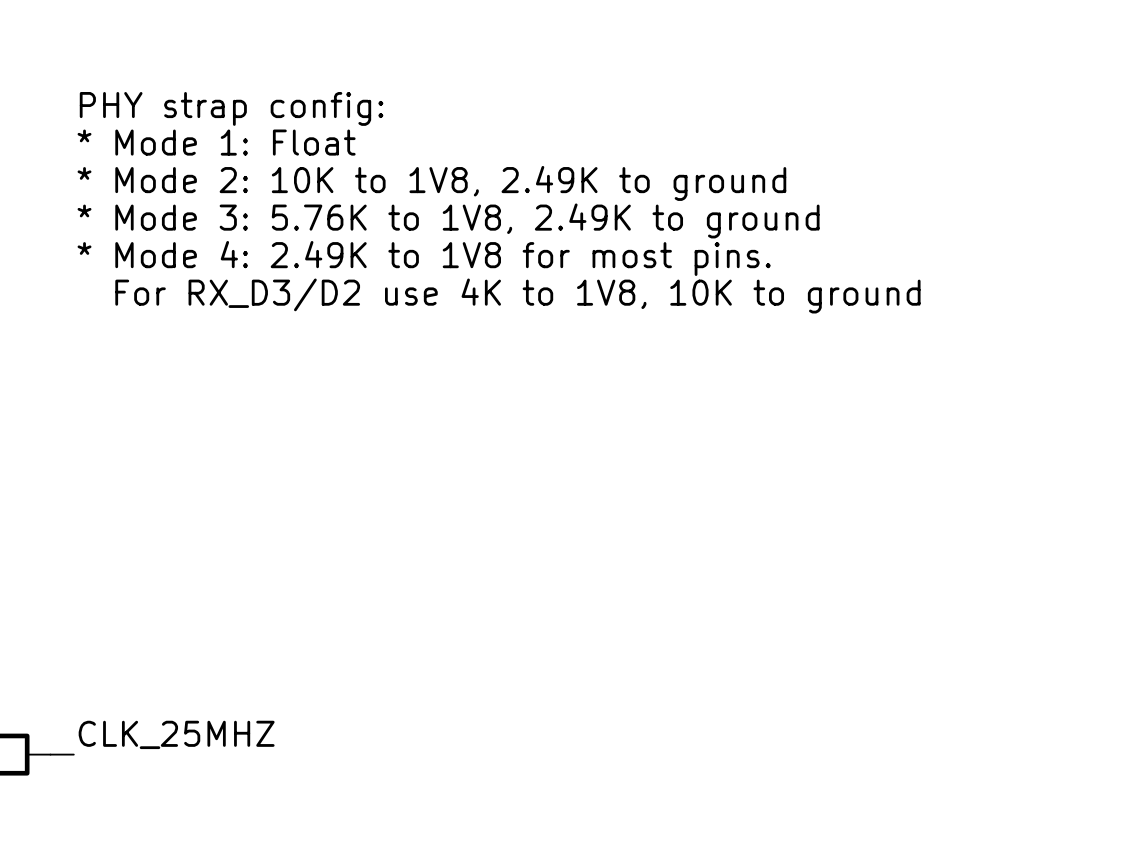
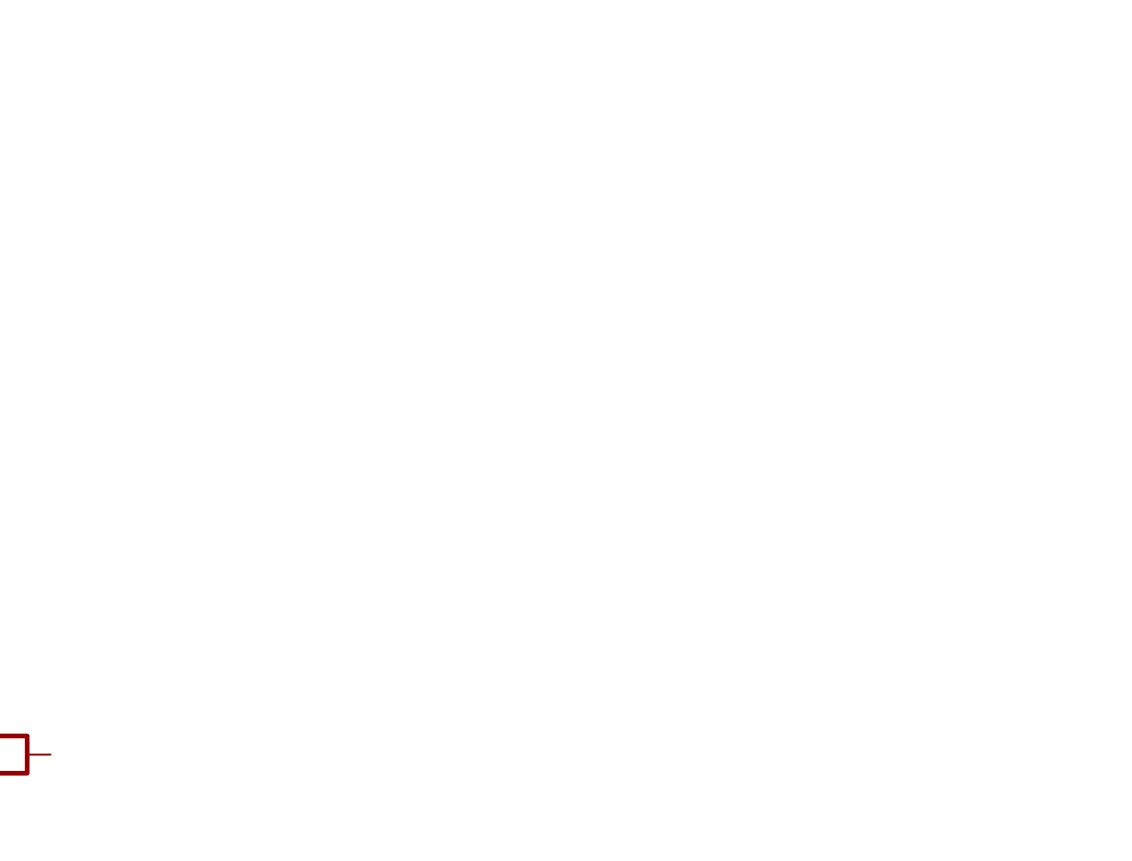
text: PHY strap config: (231, 108) -> none
text: * Mode 1: Float (216, 142) -> none
text: * Mode 2: 10K to 1V8, 2.49K to ground (431, 183) -> none
text: * Mode 3: 5.76K to 1V8, 2.49K to ground (448, 220) -> none
text: * Mode 4: 2.49K to 1V8 for most pins. (424, 258) -> none
text: For RX_D3/D2 use 4K to 1V8, 10K to ground (517, 295) -> none
label: CLK_25MHZ (176, 734) -> none
wire: (50, 754) (73, 754) -> none

